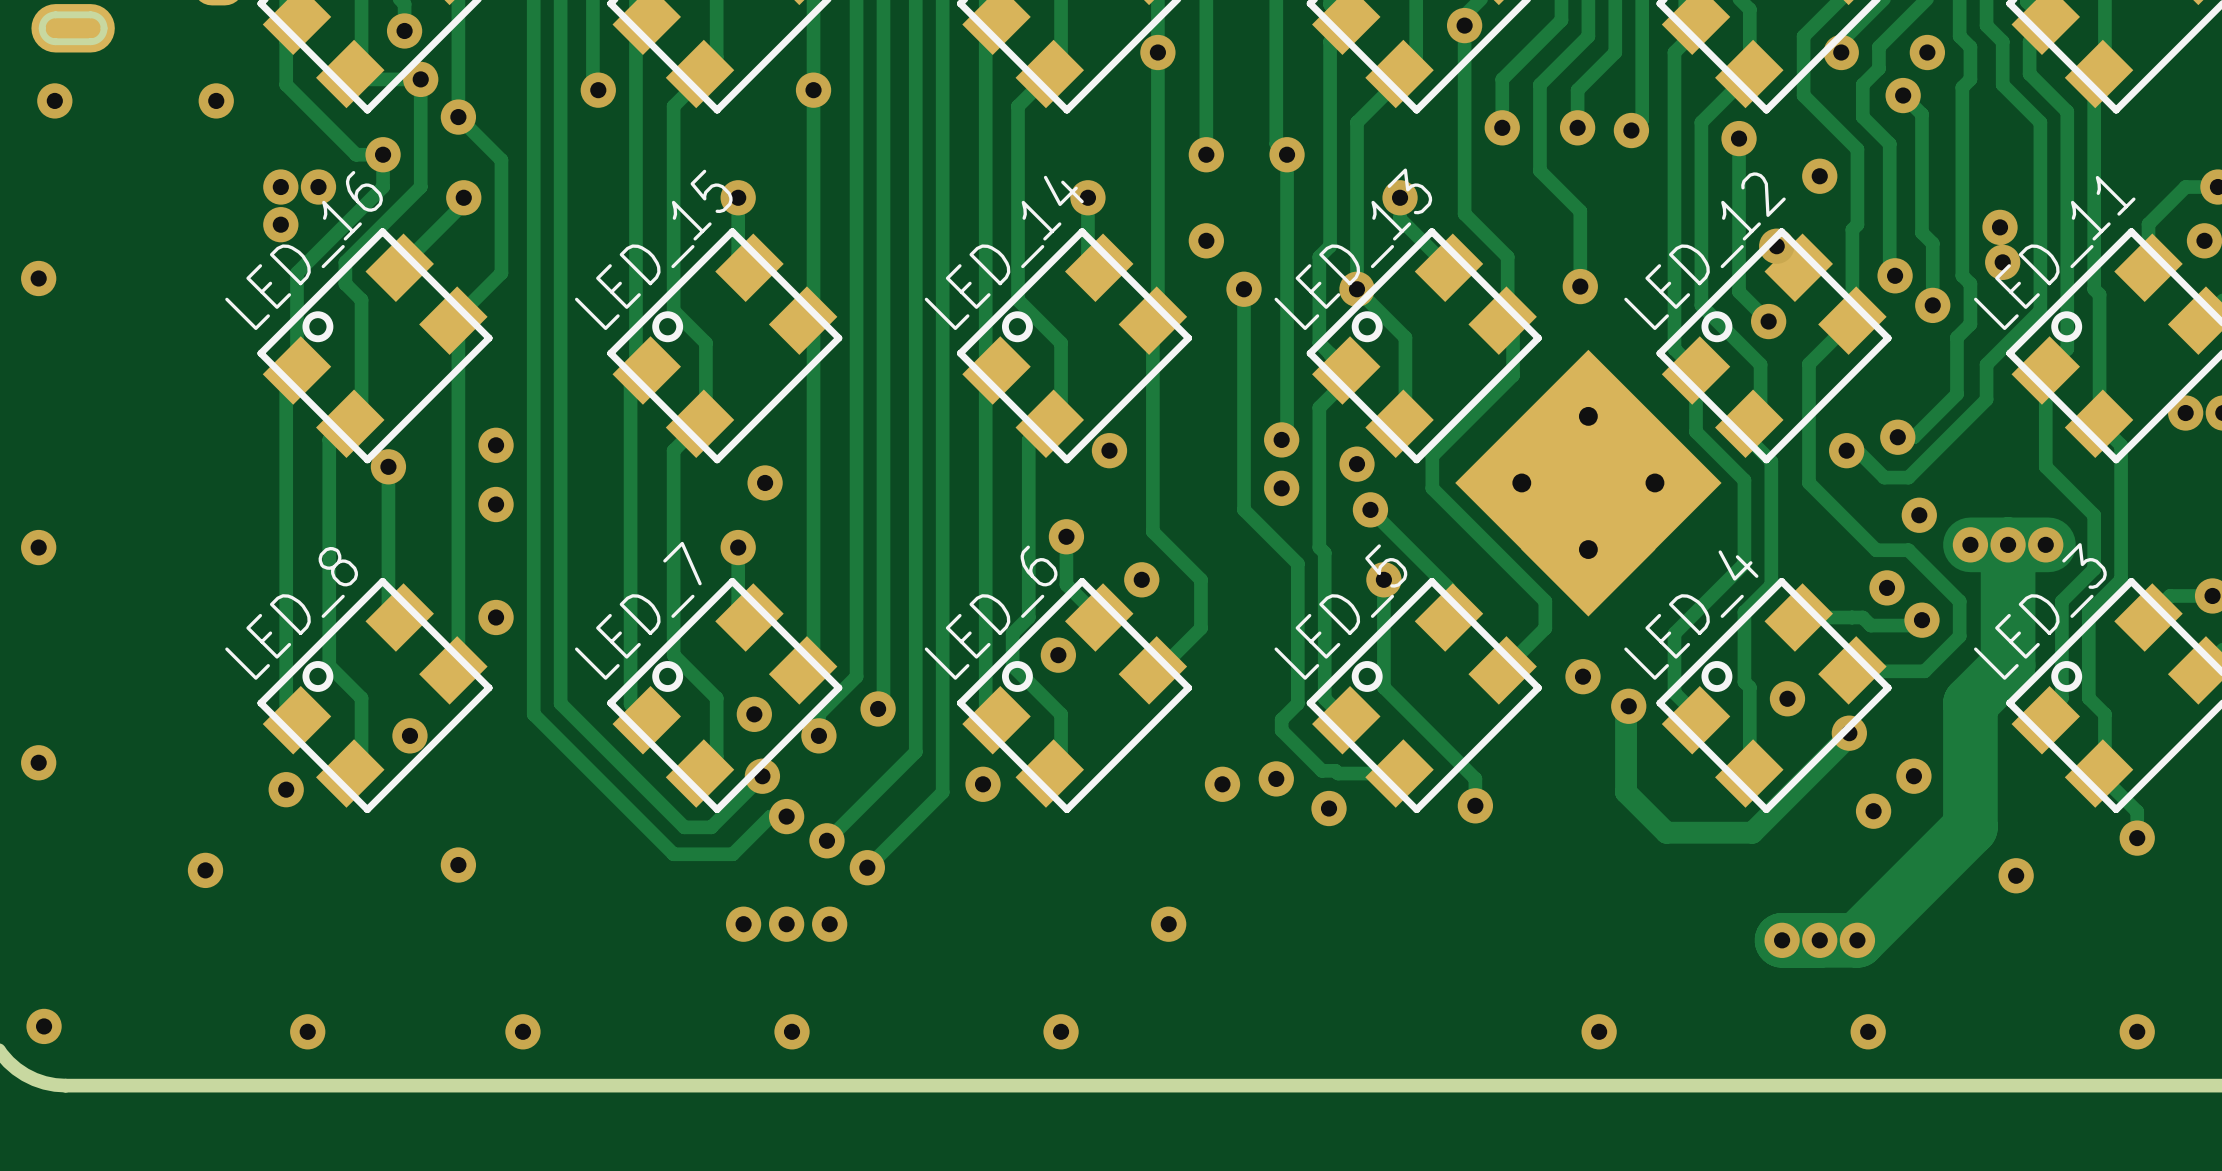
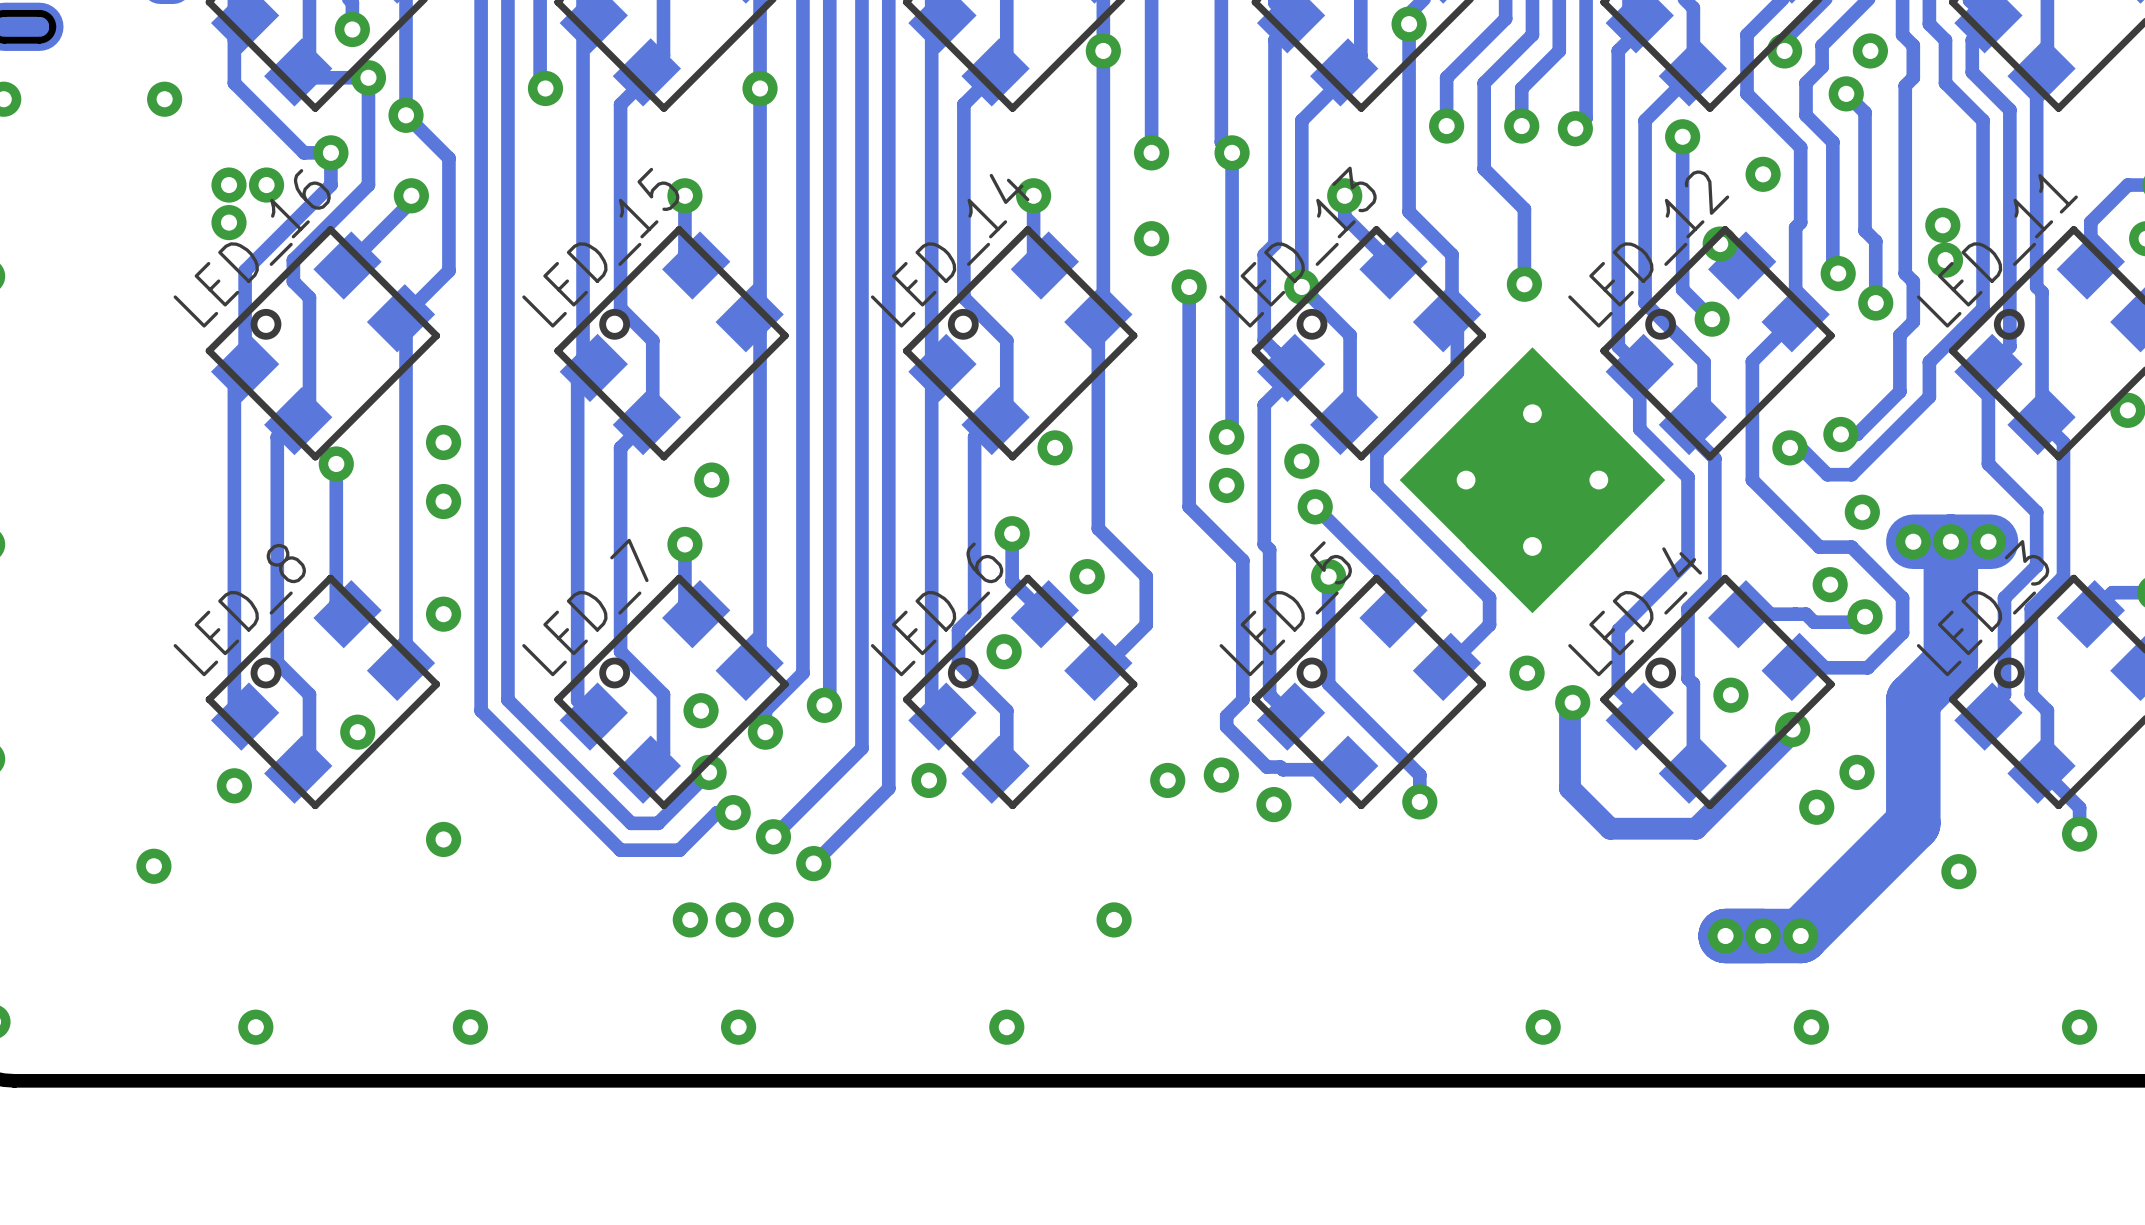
via position: (458, 865) -> (443, 839)

